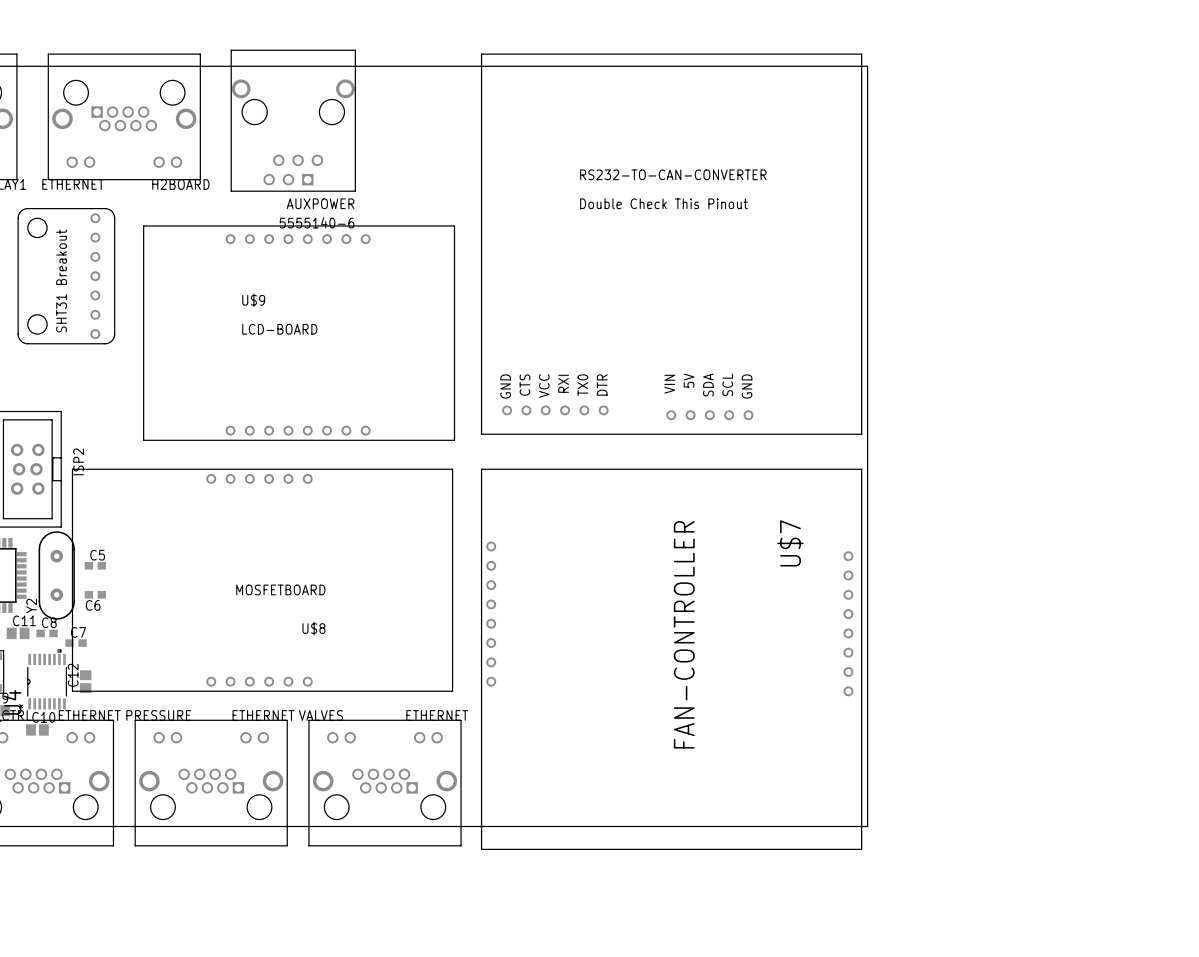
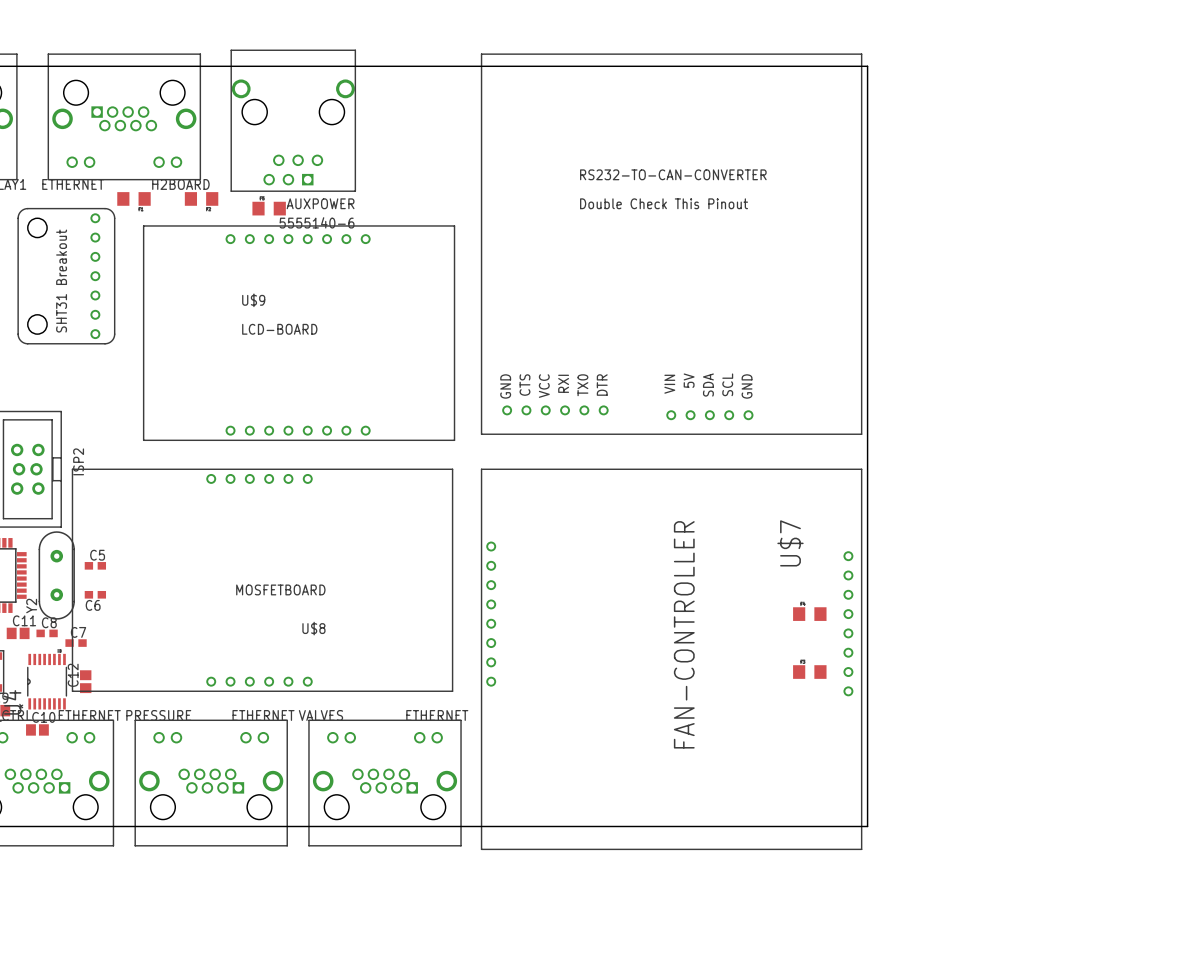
part: none -> (133, 198)
part: none -> (201, 198)
part: none -> (269, 208)
part: none -> (809, 614)
part: none -> (809, 672)

